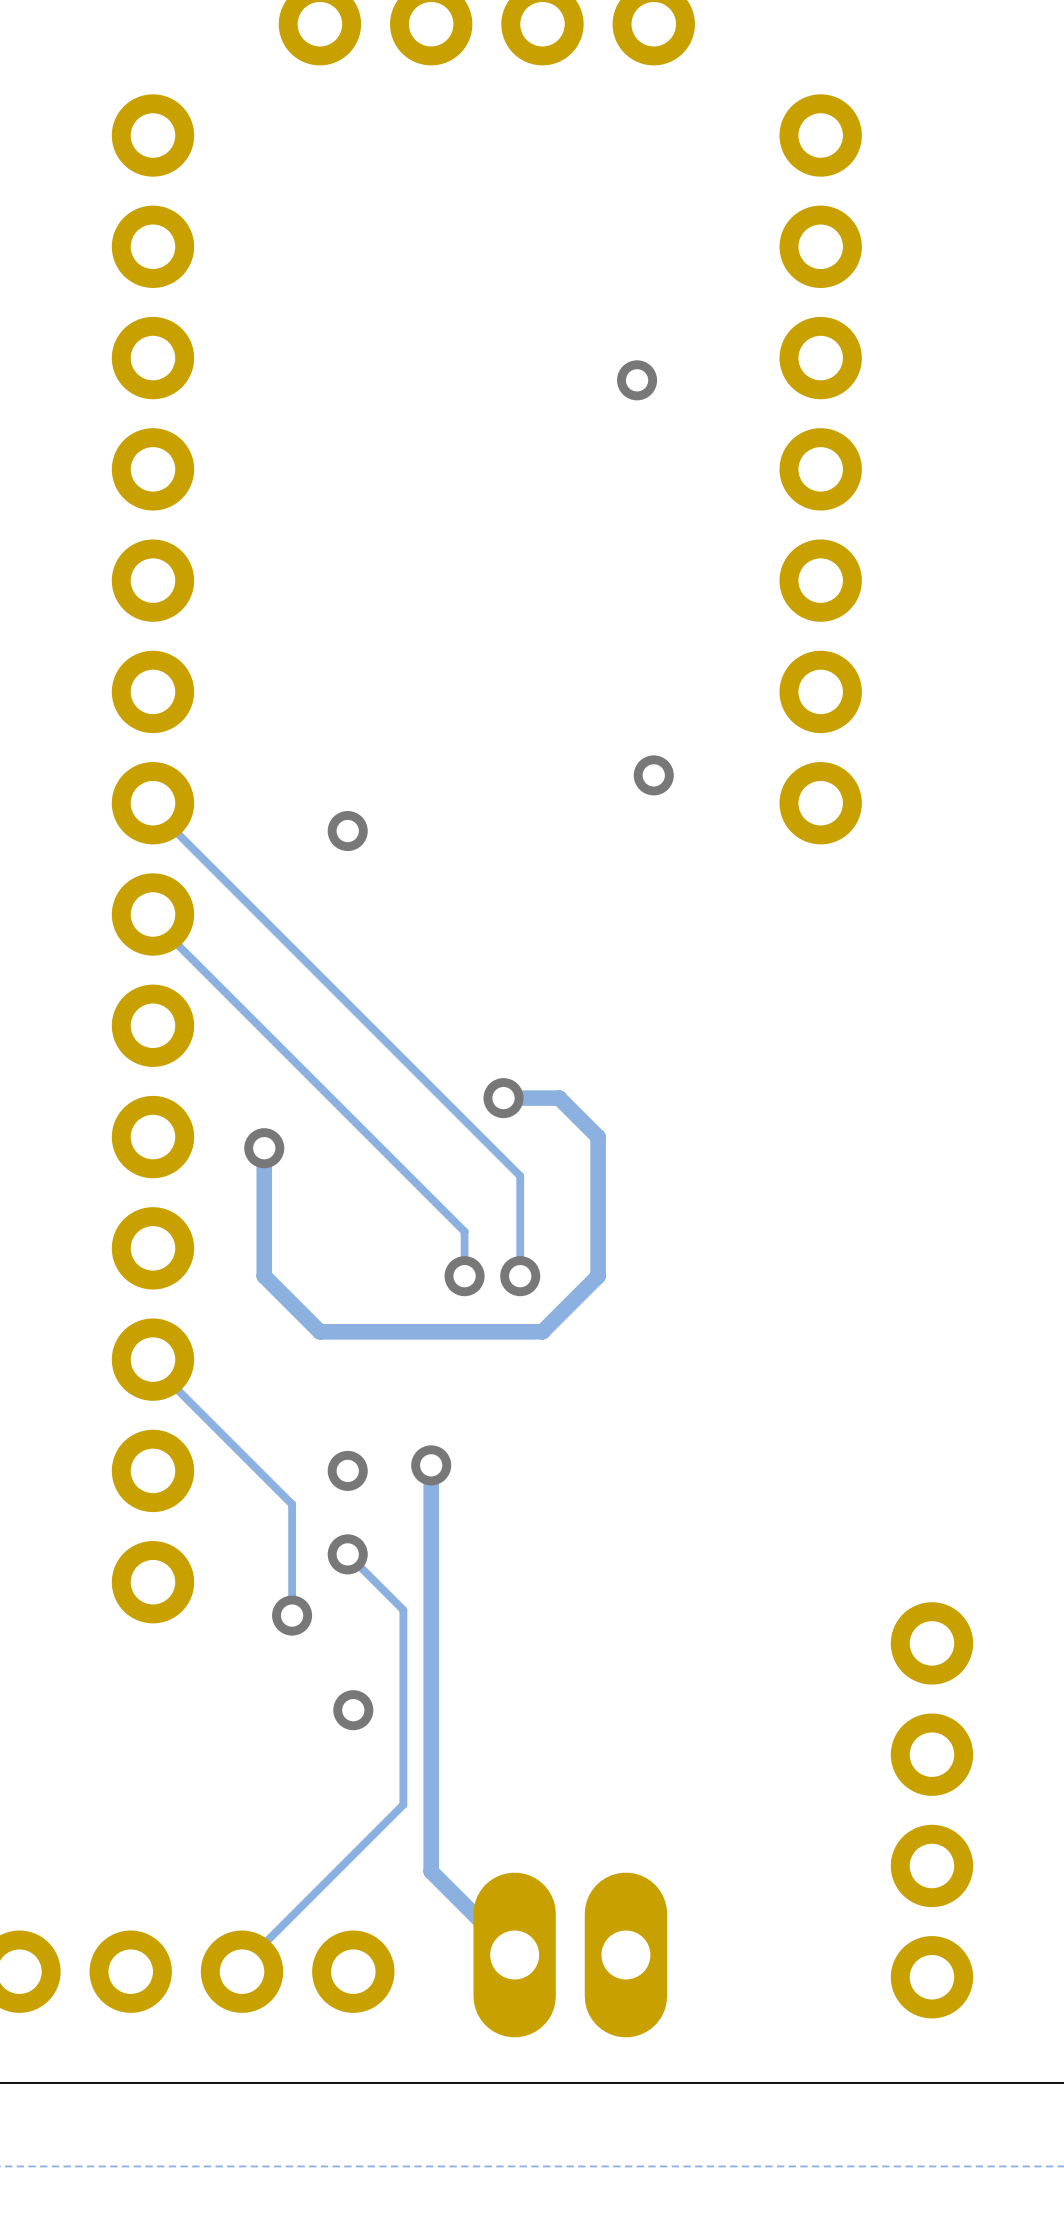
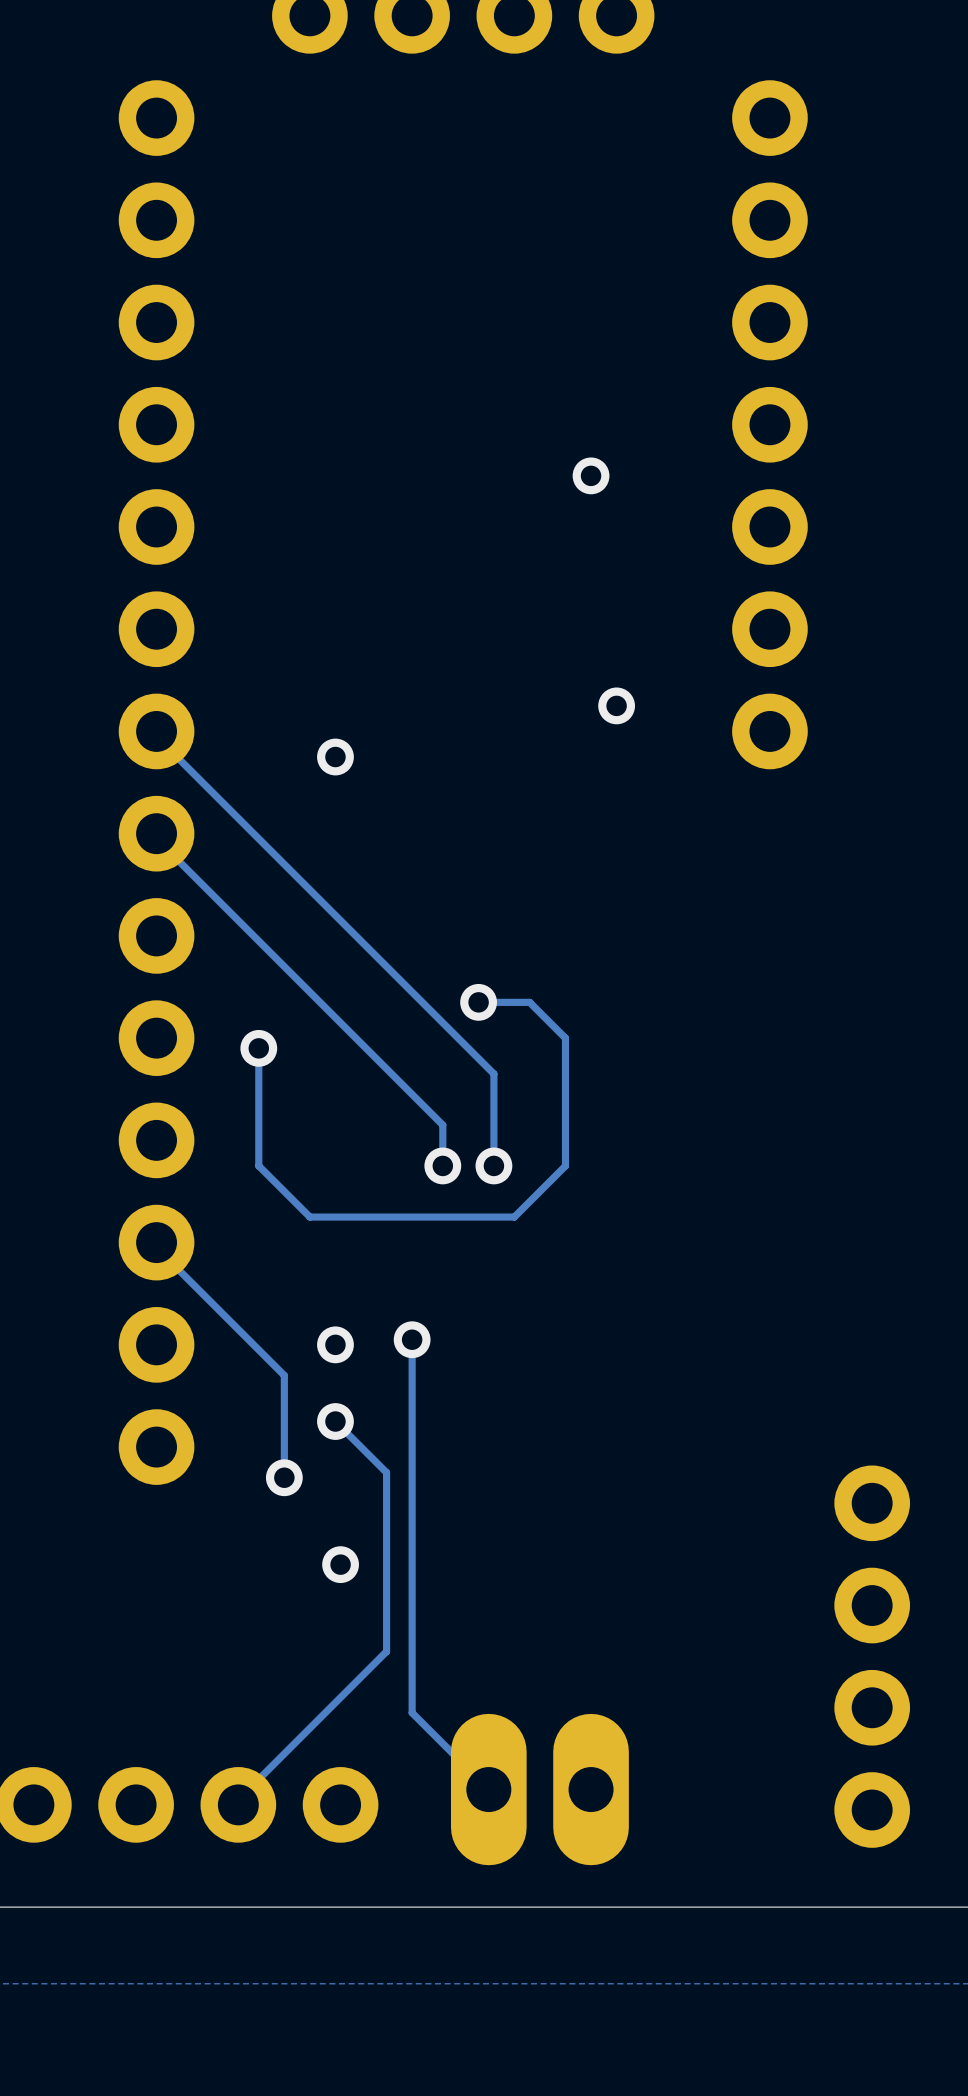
via position: (637, 380) -> (591, 475)
track width: thick (503, 1098) (559, 1098) (598, 1137) (598, 1276) (542, 1331) (319, 1331) (264, 1276) (264, 1148) -> thin (478, 1002) (529, 1002) (565, 1038) (565, 1165) (514, 1217) (309, 1217) (258, 1165) (258, 1048)
track width: thick (431, 1465) (431, 1871) (514, 1955) -> thin (412, 1339) (412, 1712) (488, 1789)

